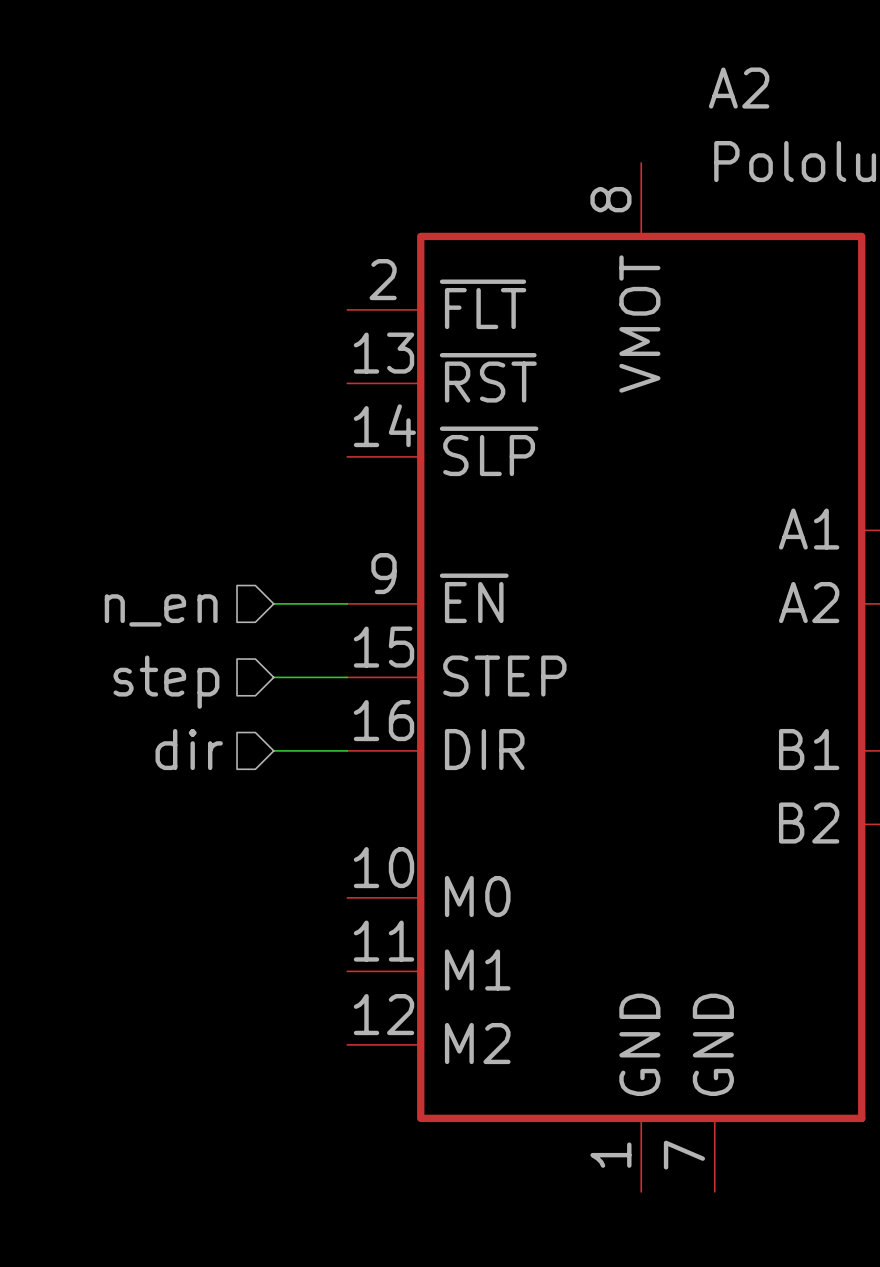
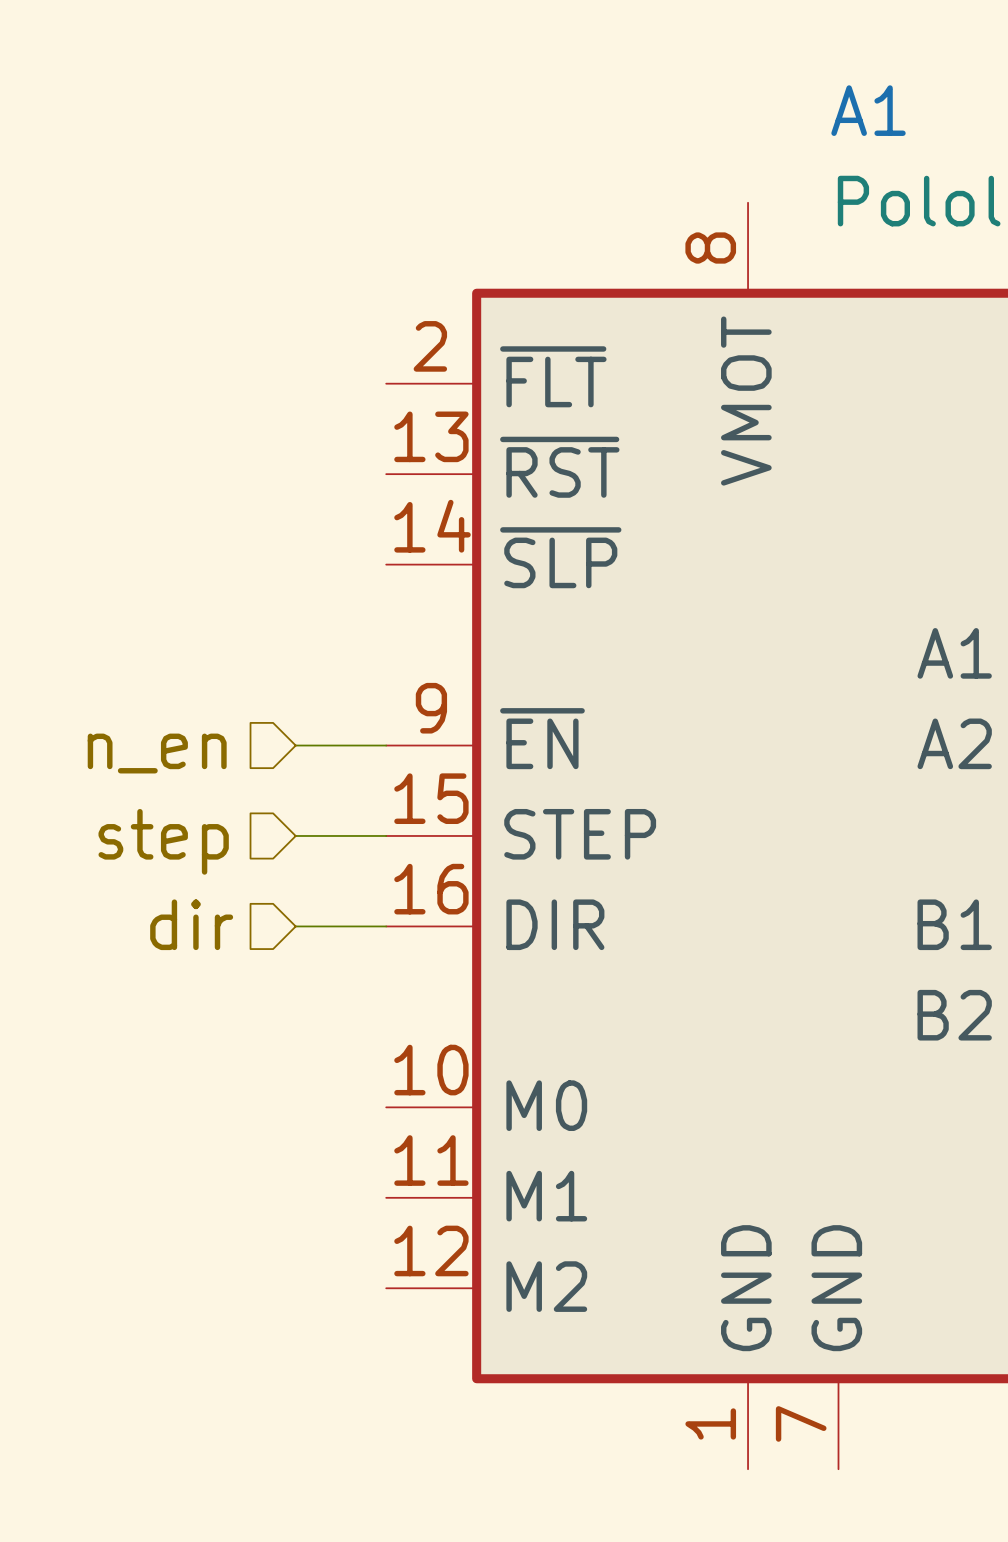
A2 name: A2 (739, 88) -> A1 (868, 110)

